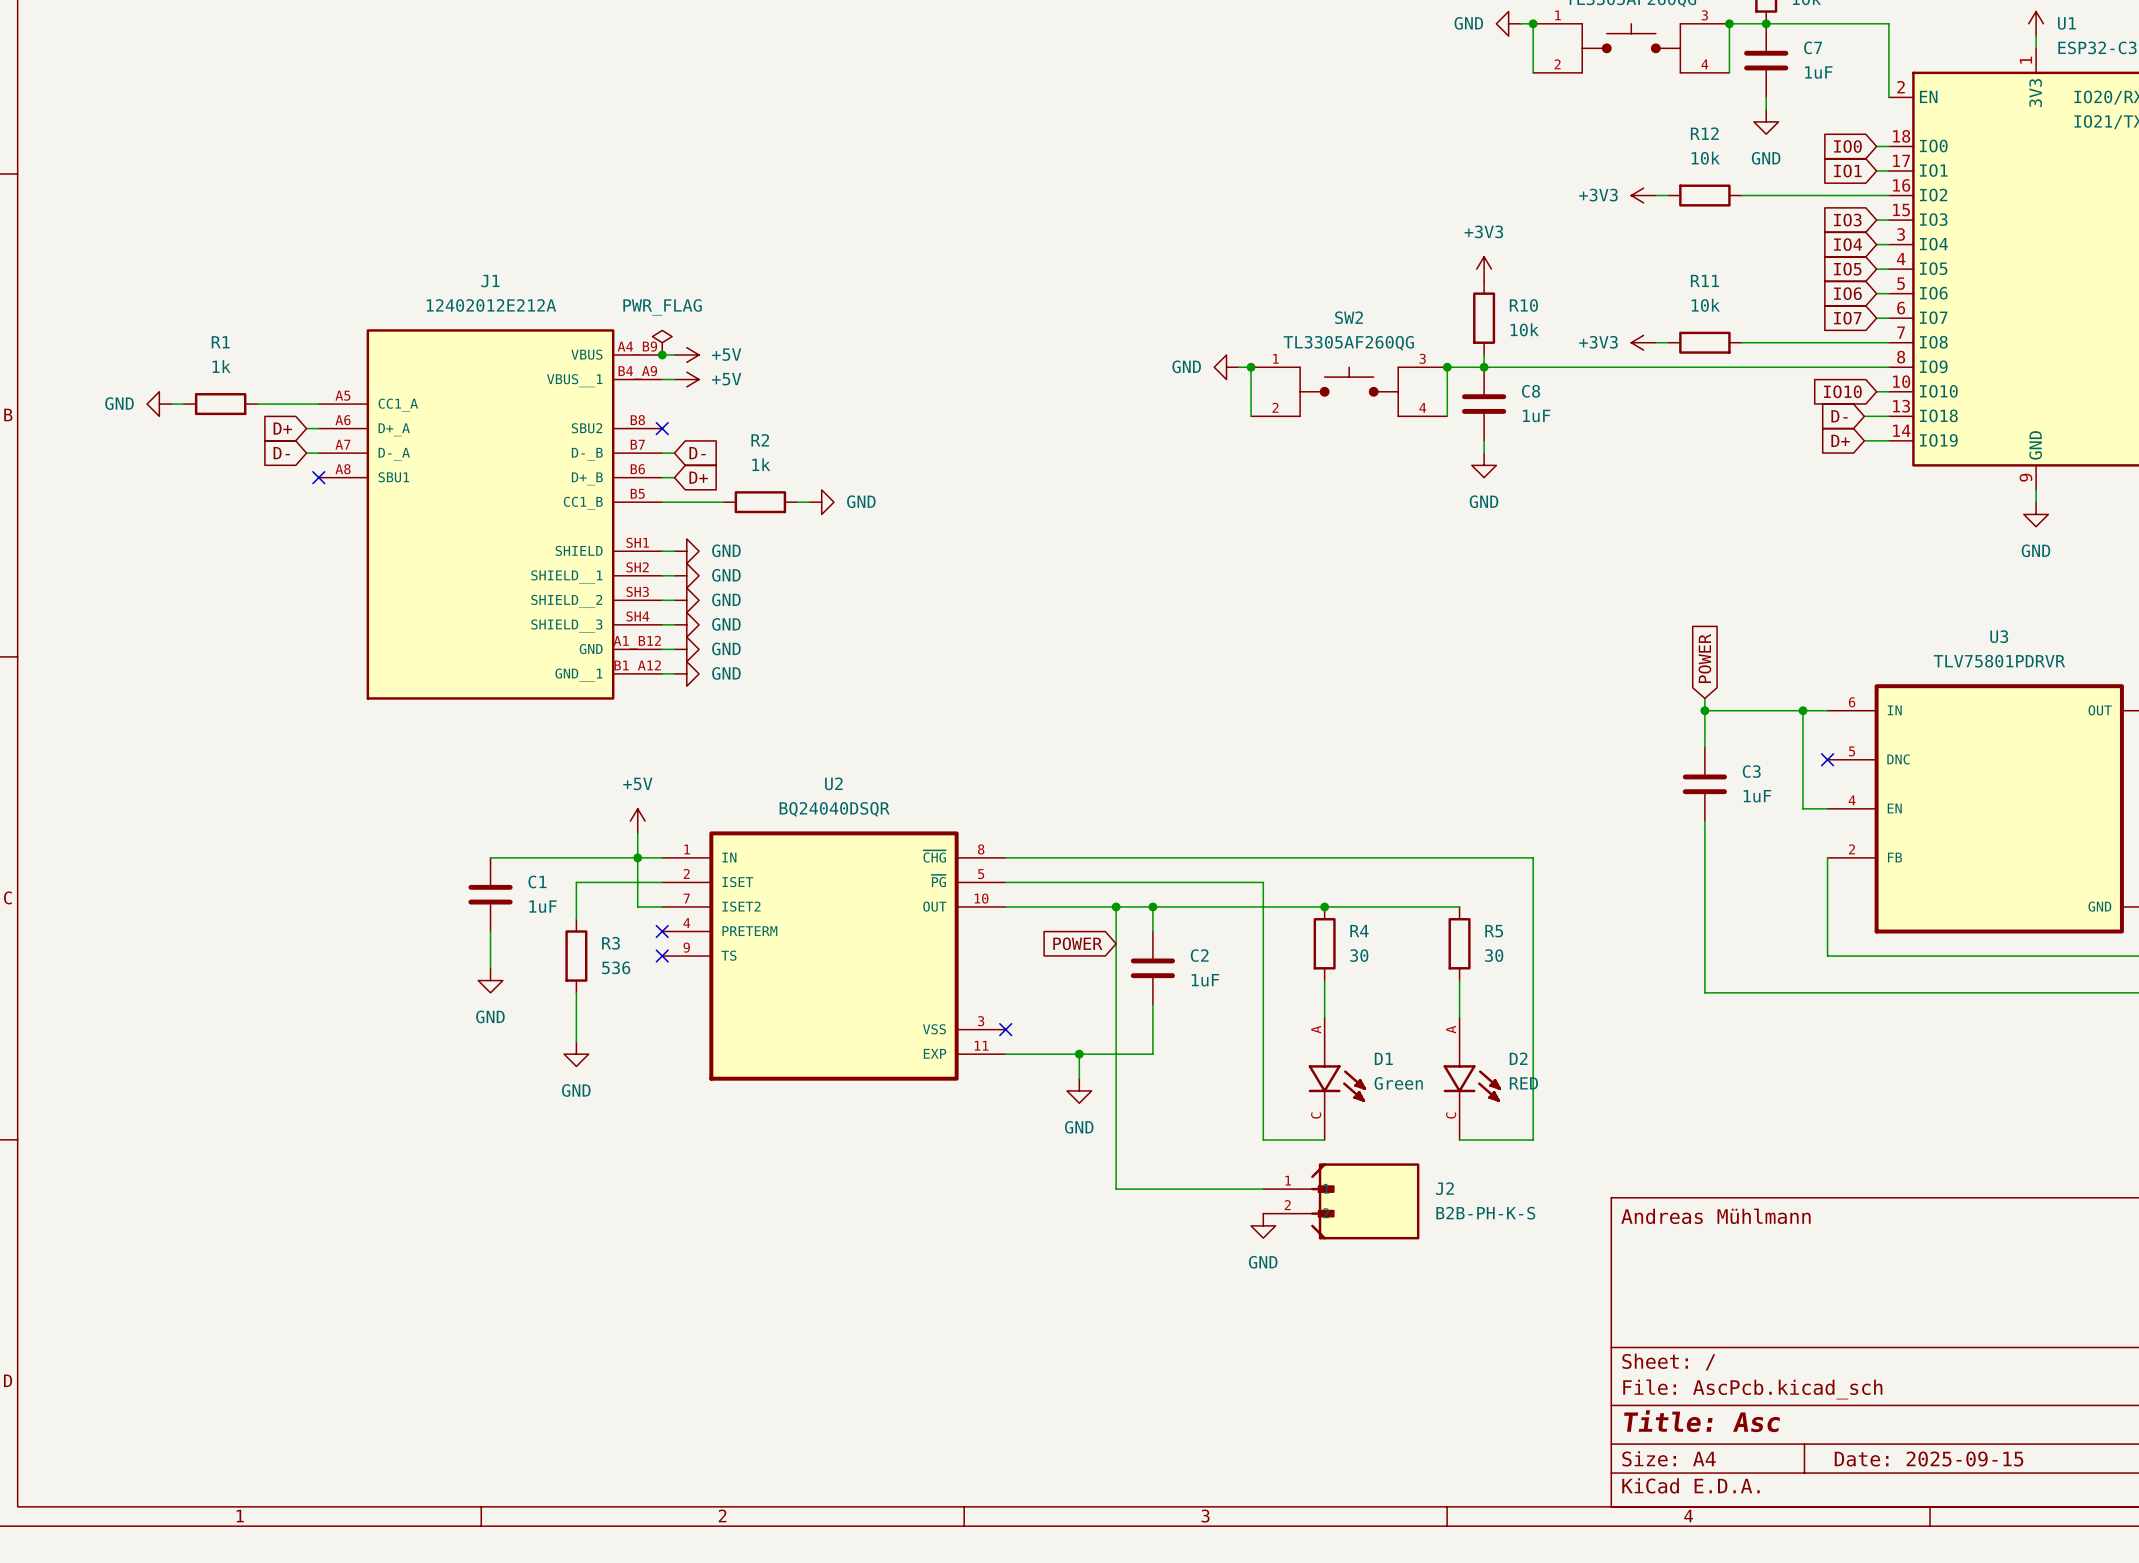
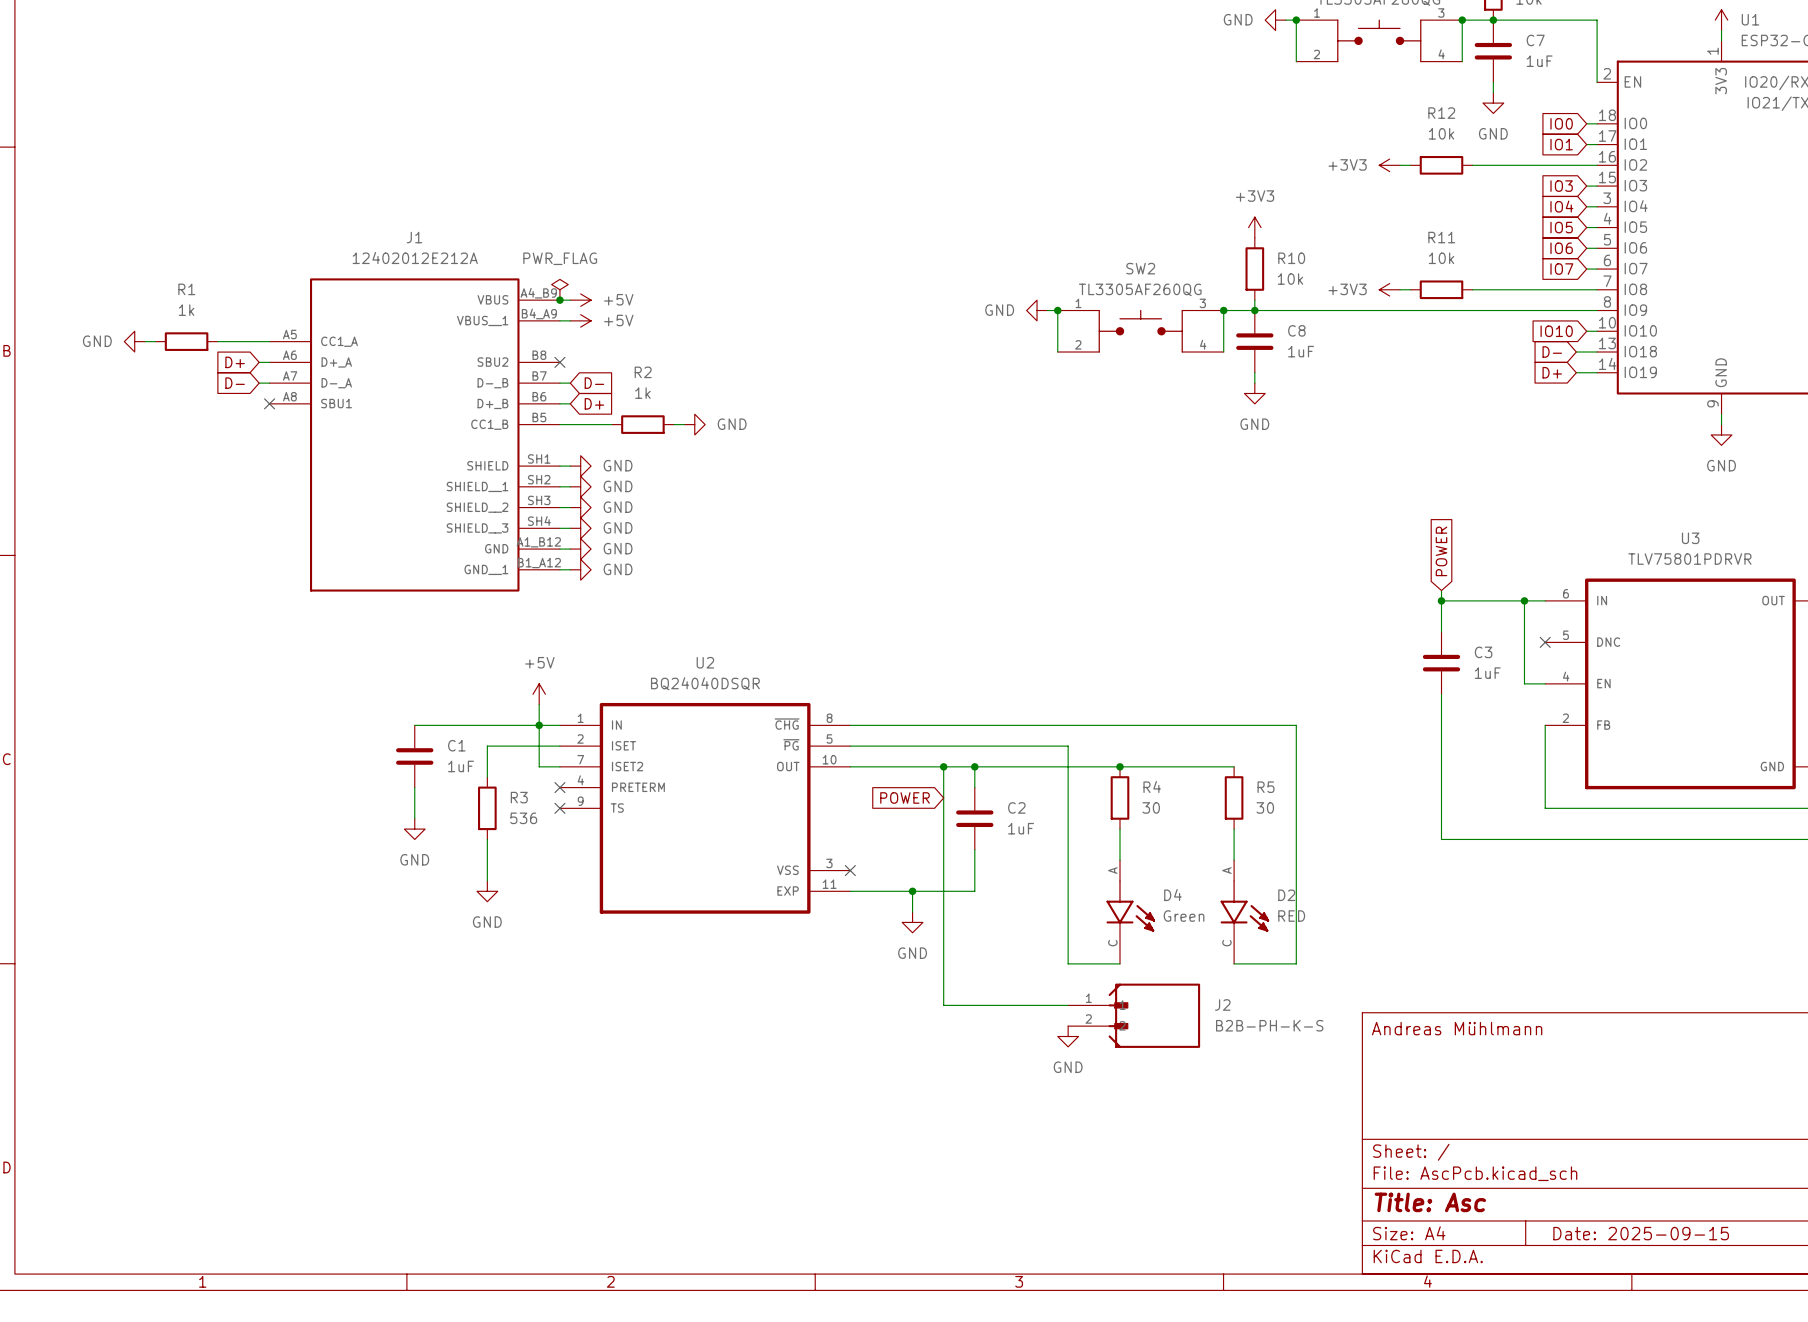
D1 name: D1 (1383, 1058) -> D4 (1172, 895)

